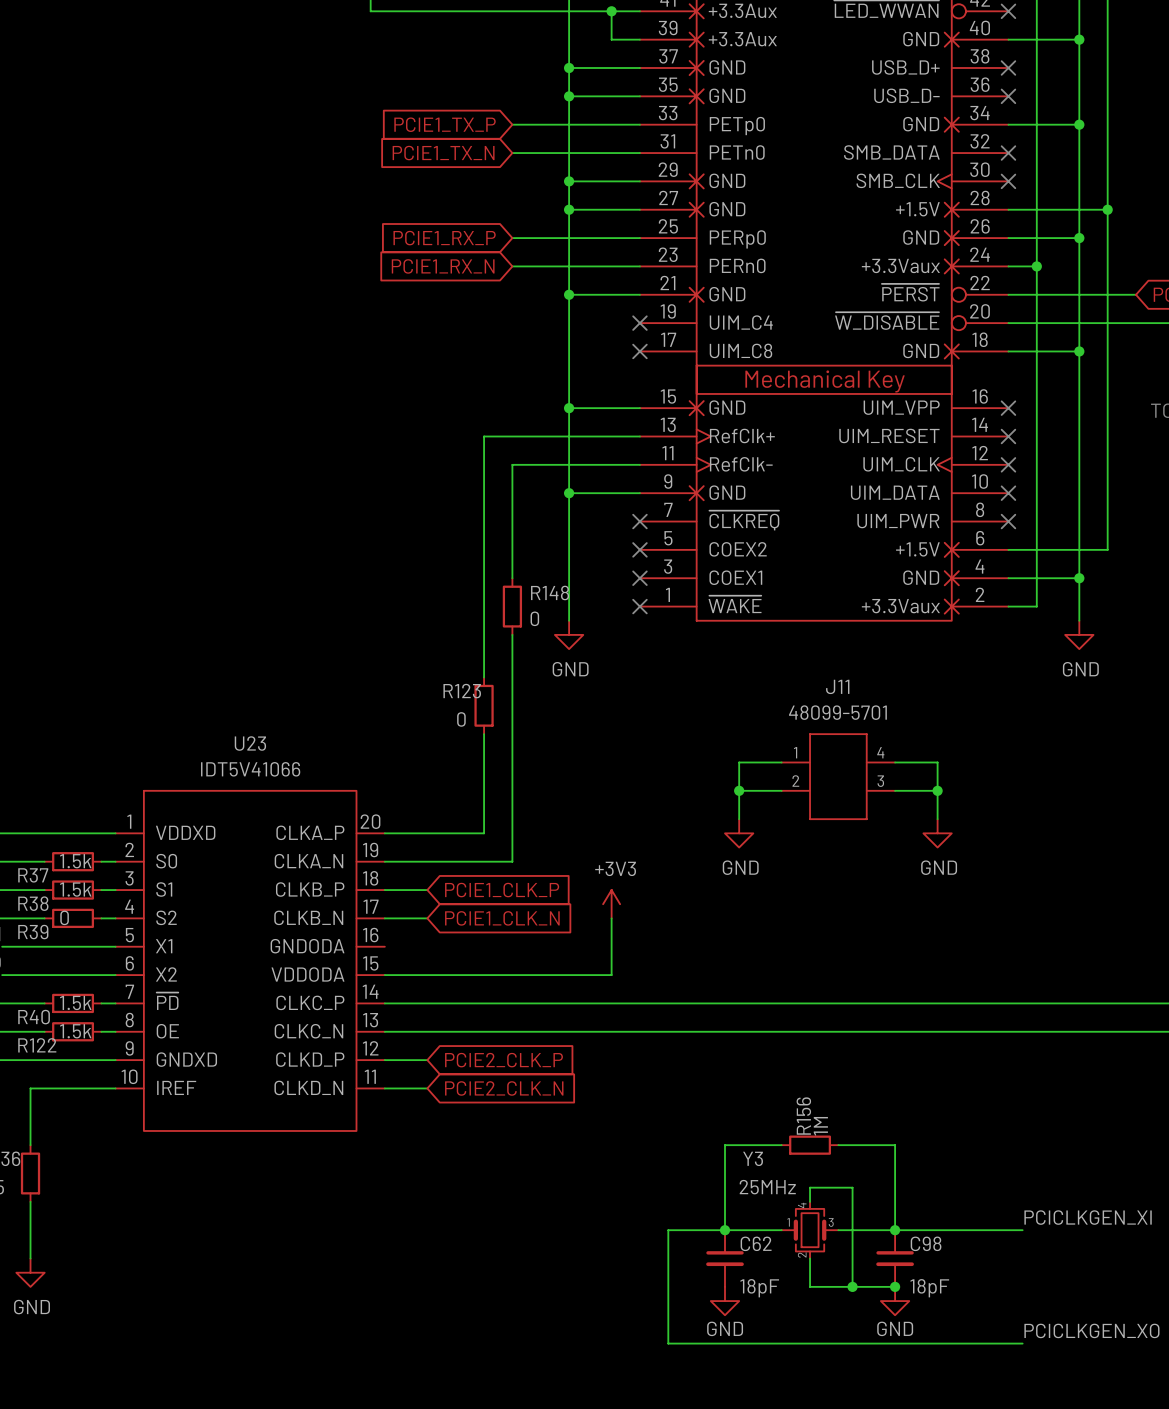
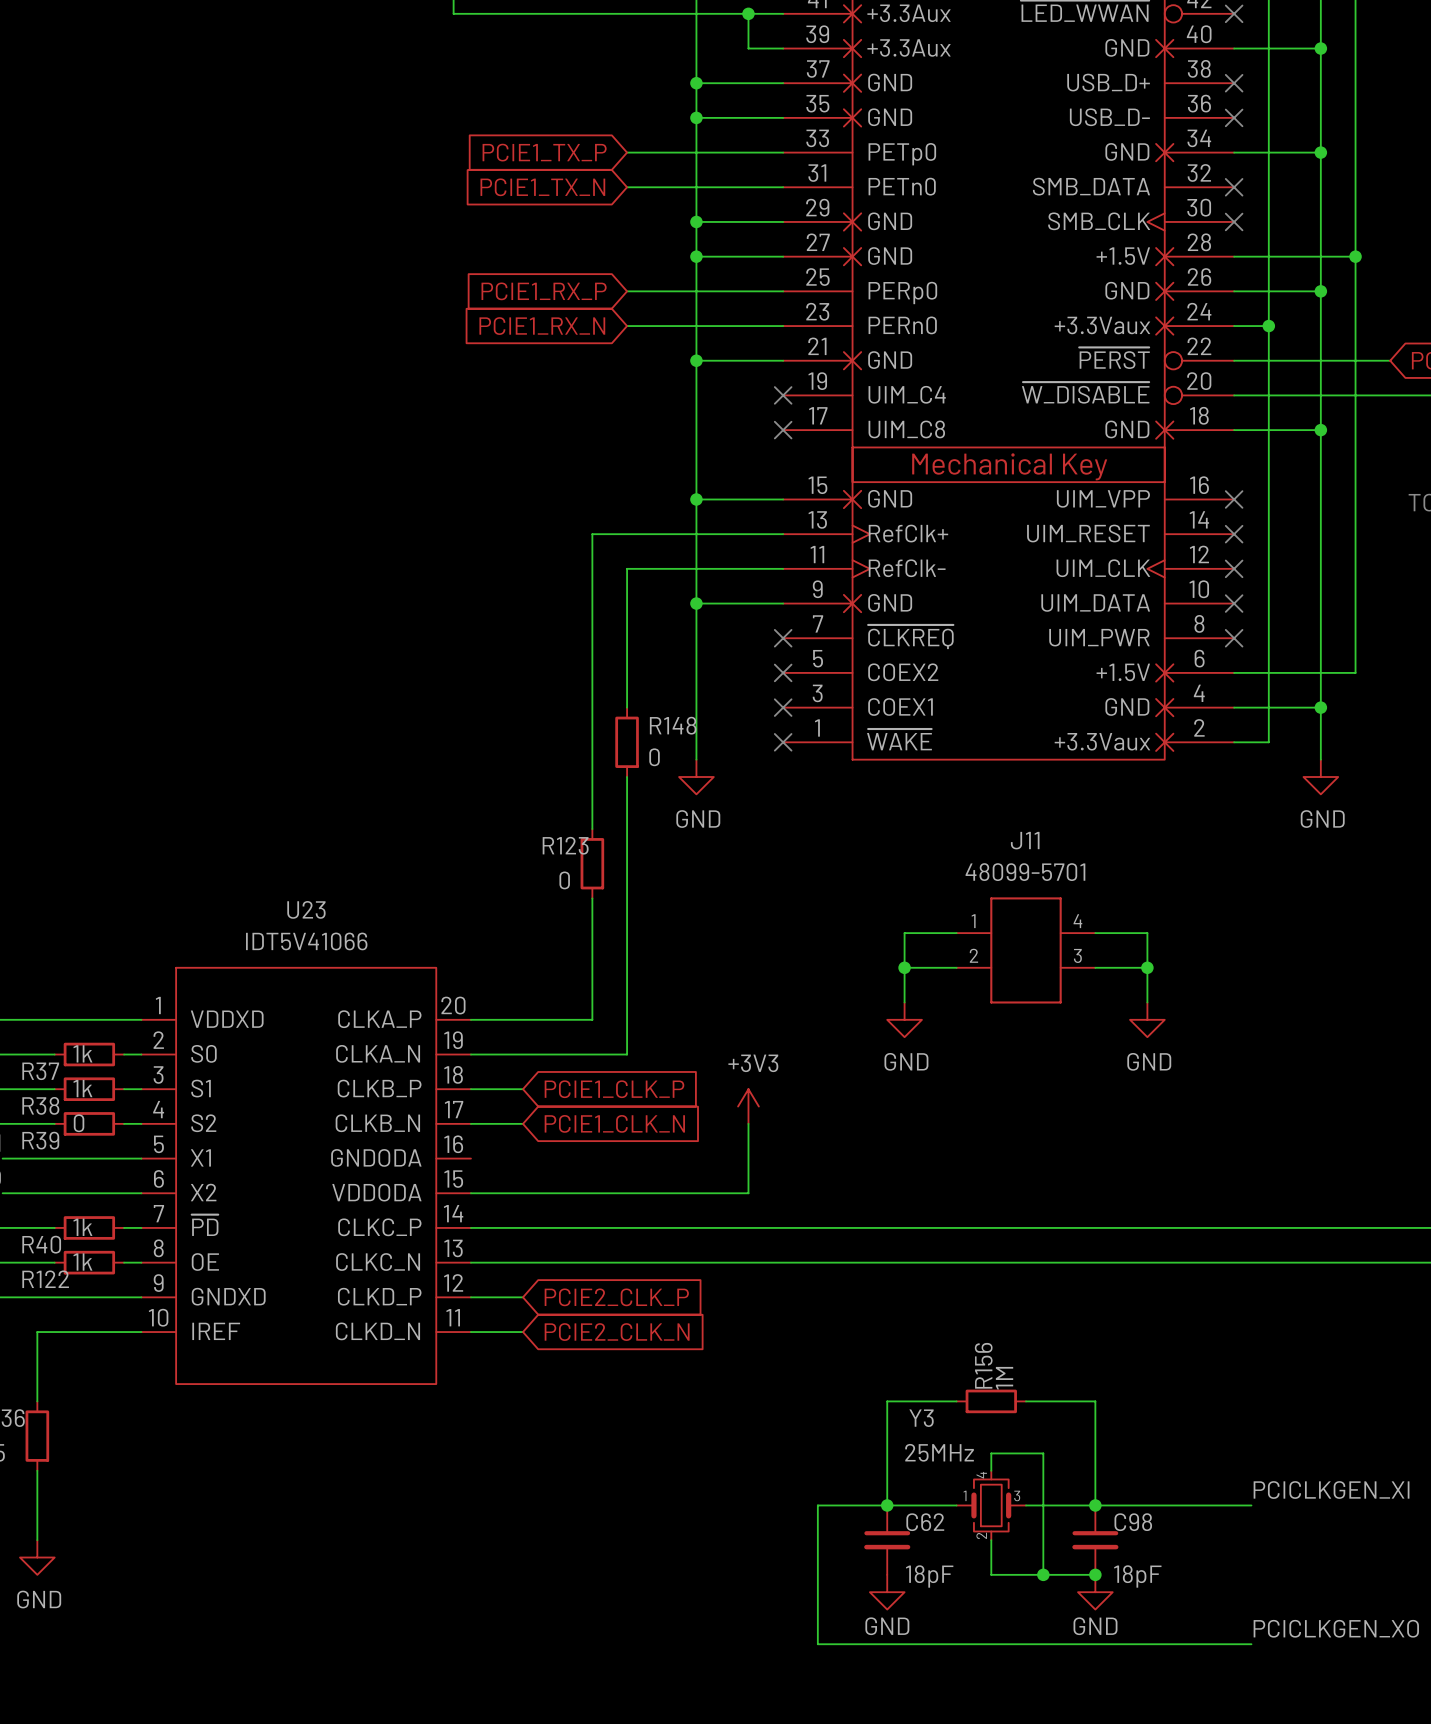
R37 value: 1.5k (75, 861) -> 1k (82, 1053)
R38 value: 1.5k (75, 889) -> 1k (82, 1088)
R40 value: 1.5k (75, 1002) -> 1k (82, 1227)
R122 value: 1.5k (75, 1031) -> 1k (82, 1262)

